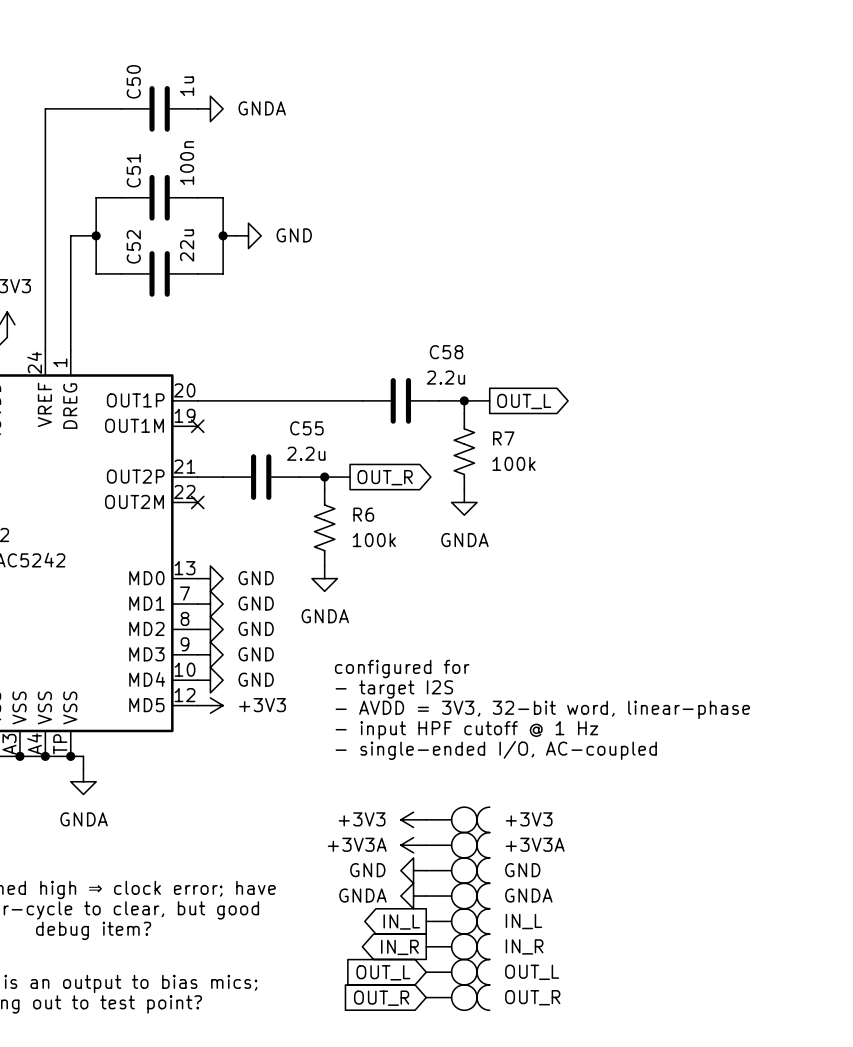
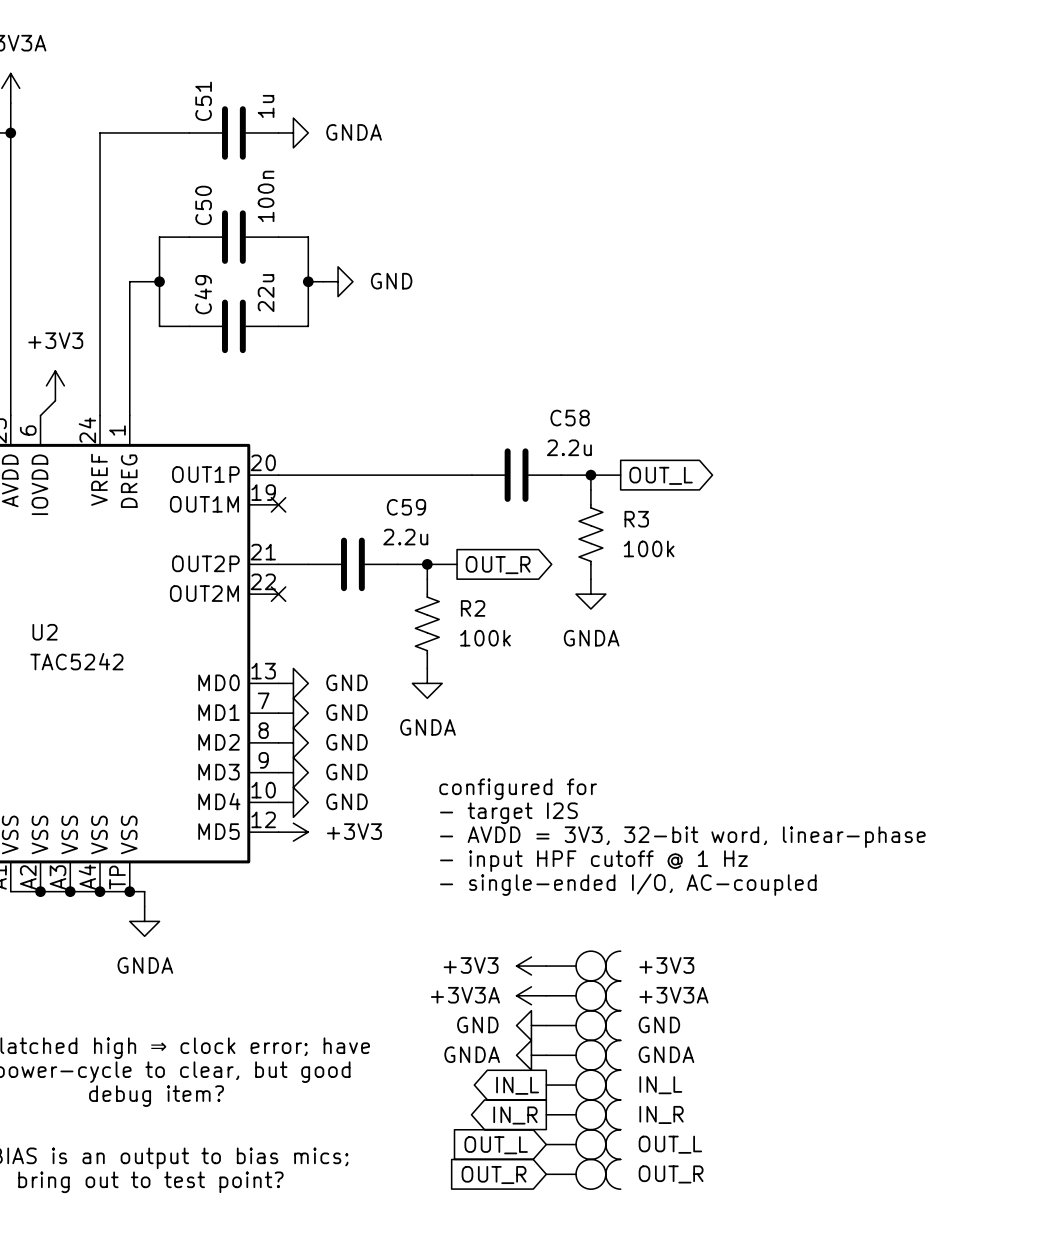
C50 name: C50 (133, 81) -> C51 (203, 101)
C51 name: C51 (133, 170) -> C50 (203, 205)
C52 name: C52 (133, 246) -> C49 (203, 294)
C55 name: C55 (306, 428) -> C59 (406, 507)
R7 name: R7 (503, 438) -> R3 (636, 519)
R6 name: R6 (363, 514) -> R2 (473, 608)

